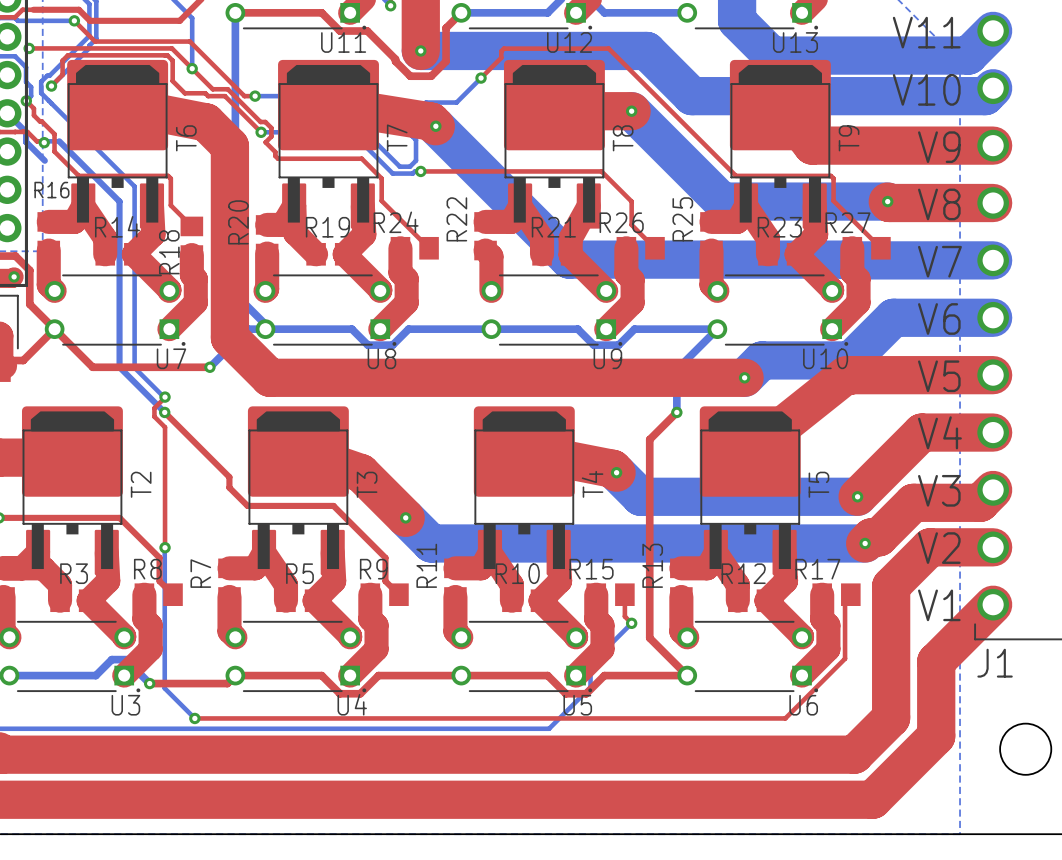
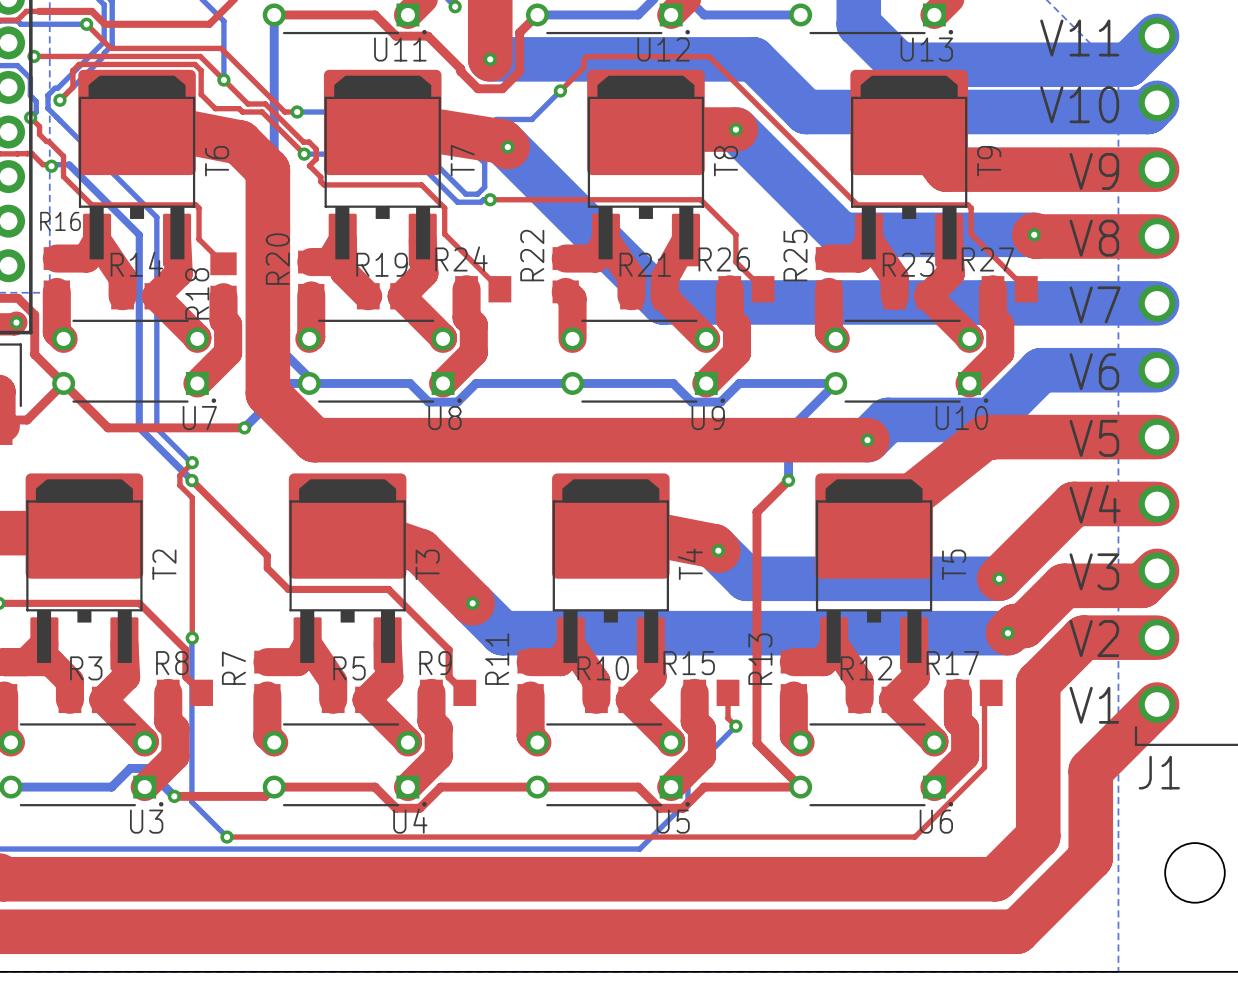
bottom track: (7, 113) (26, 132) (26, 141) (44, 160) -> none

